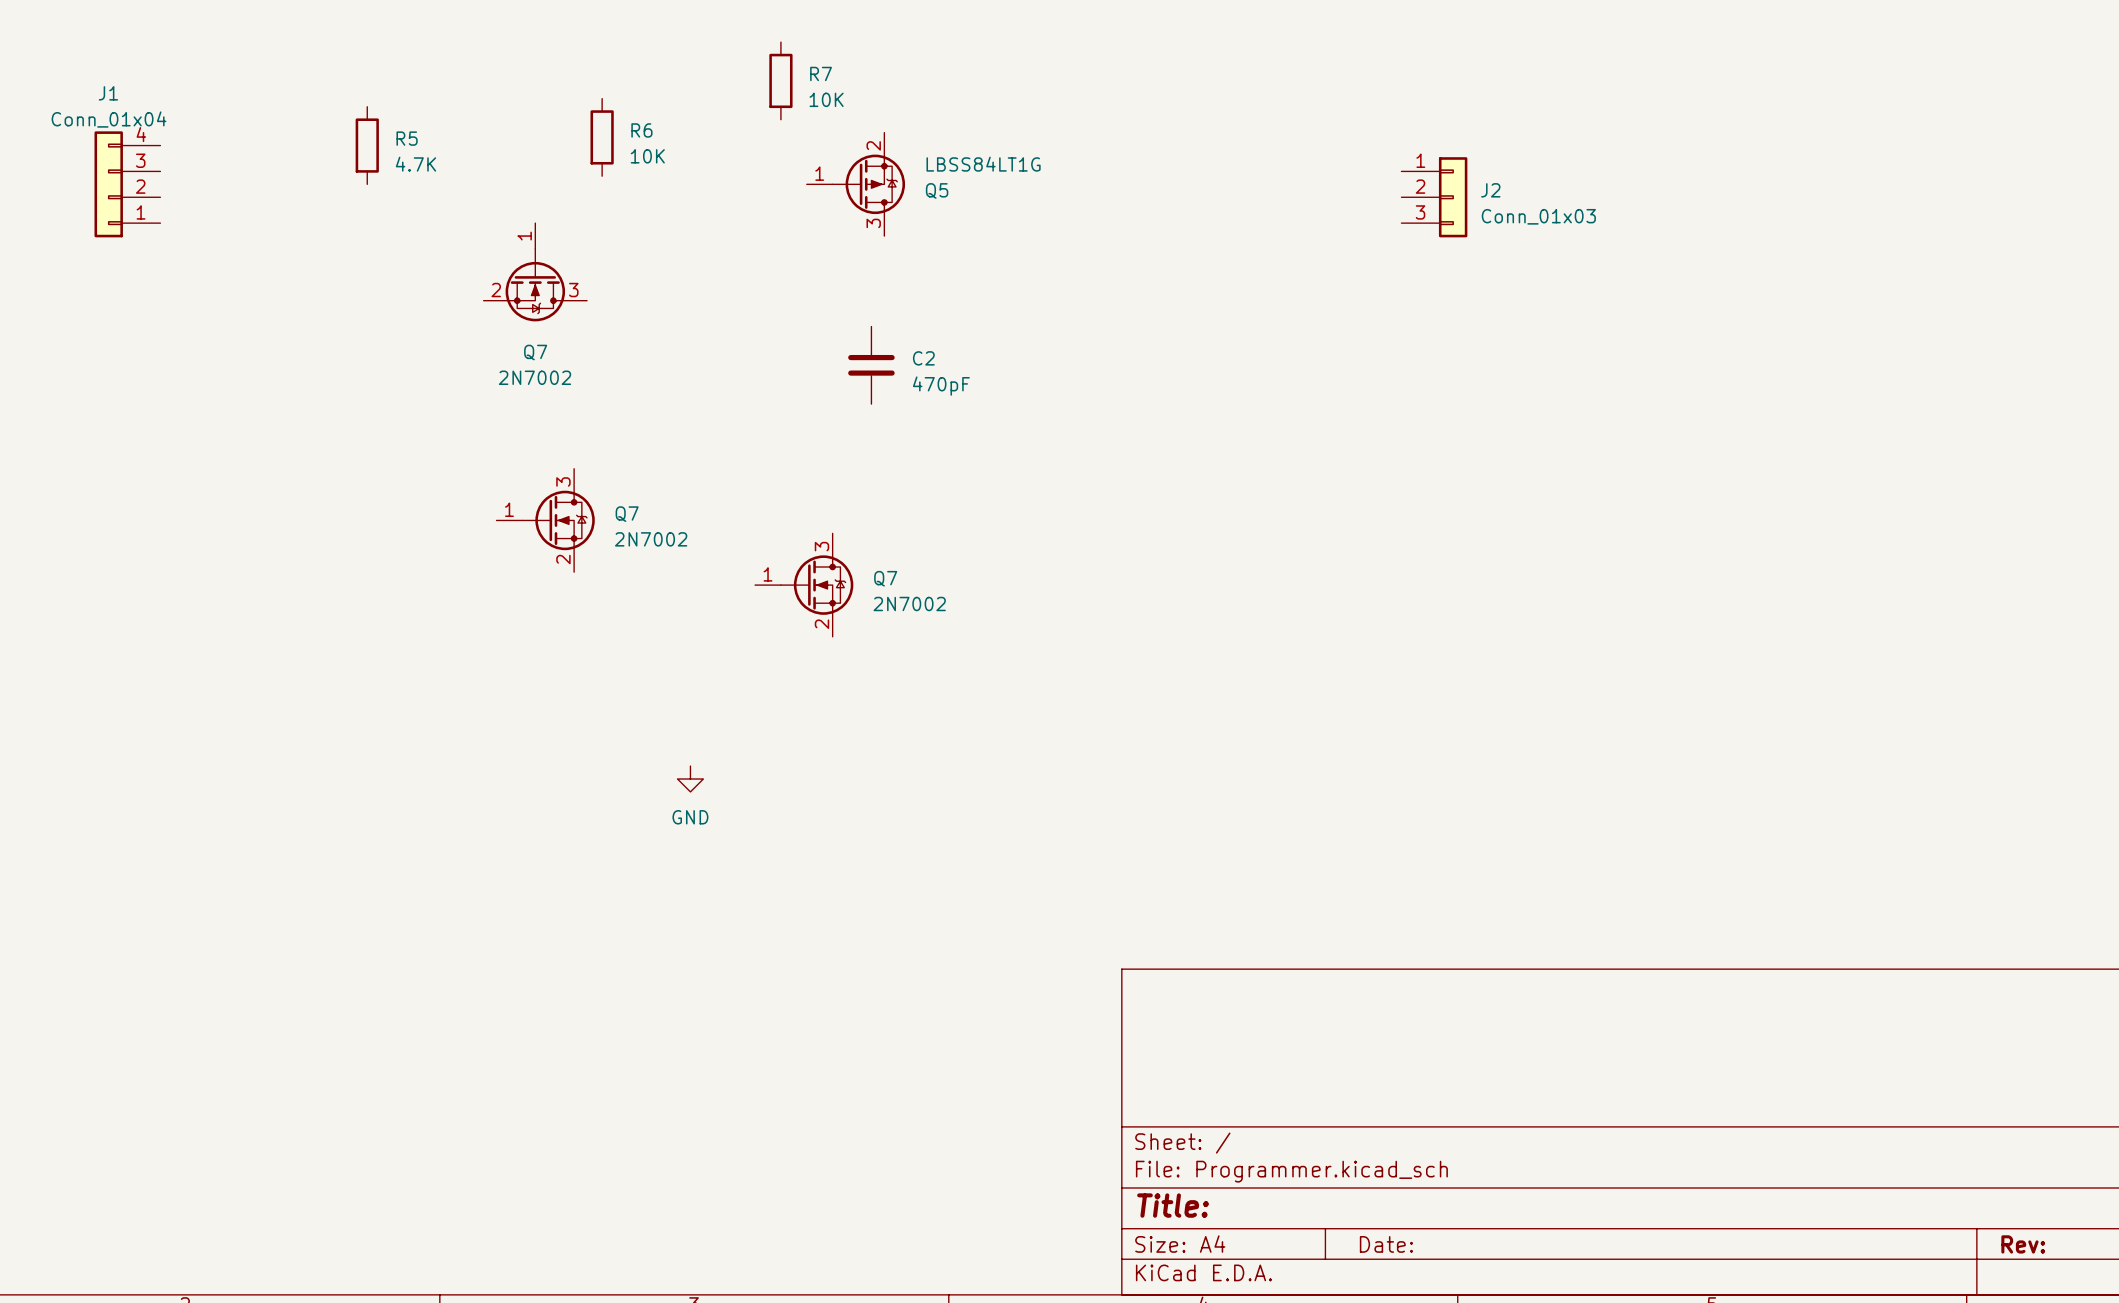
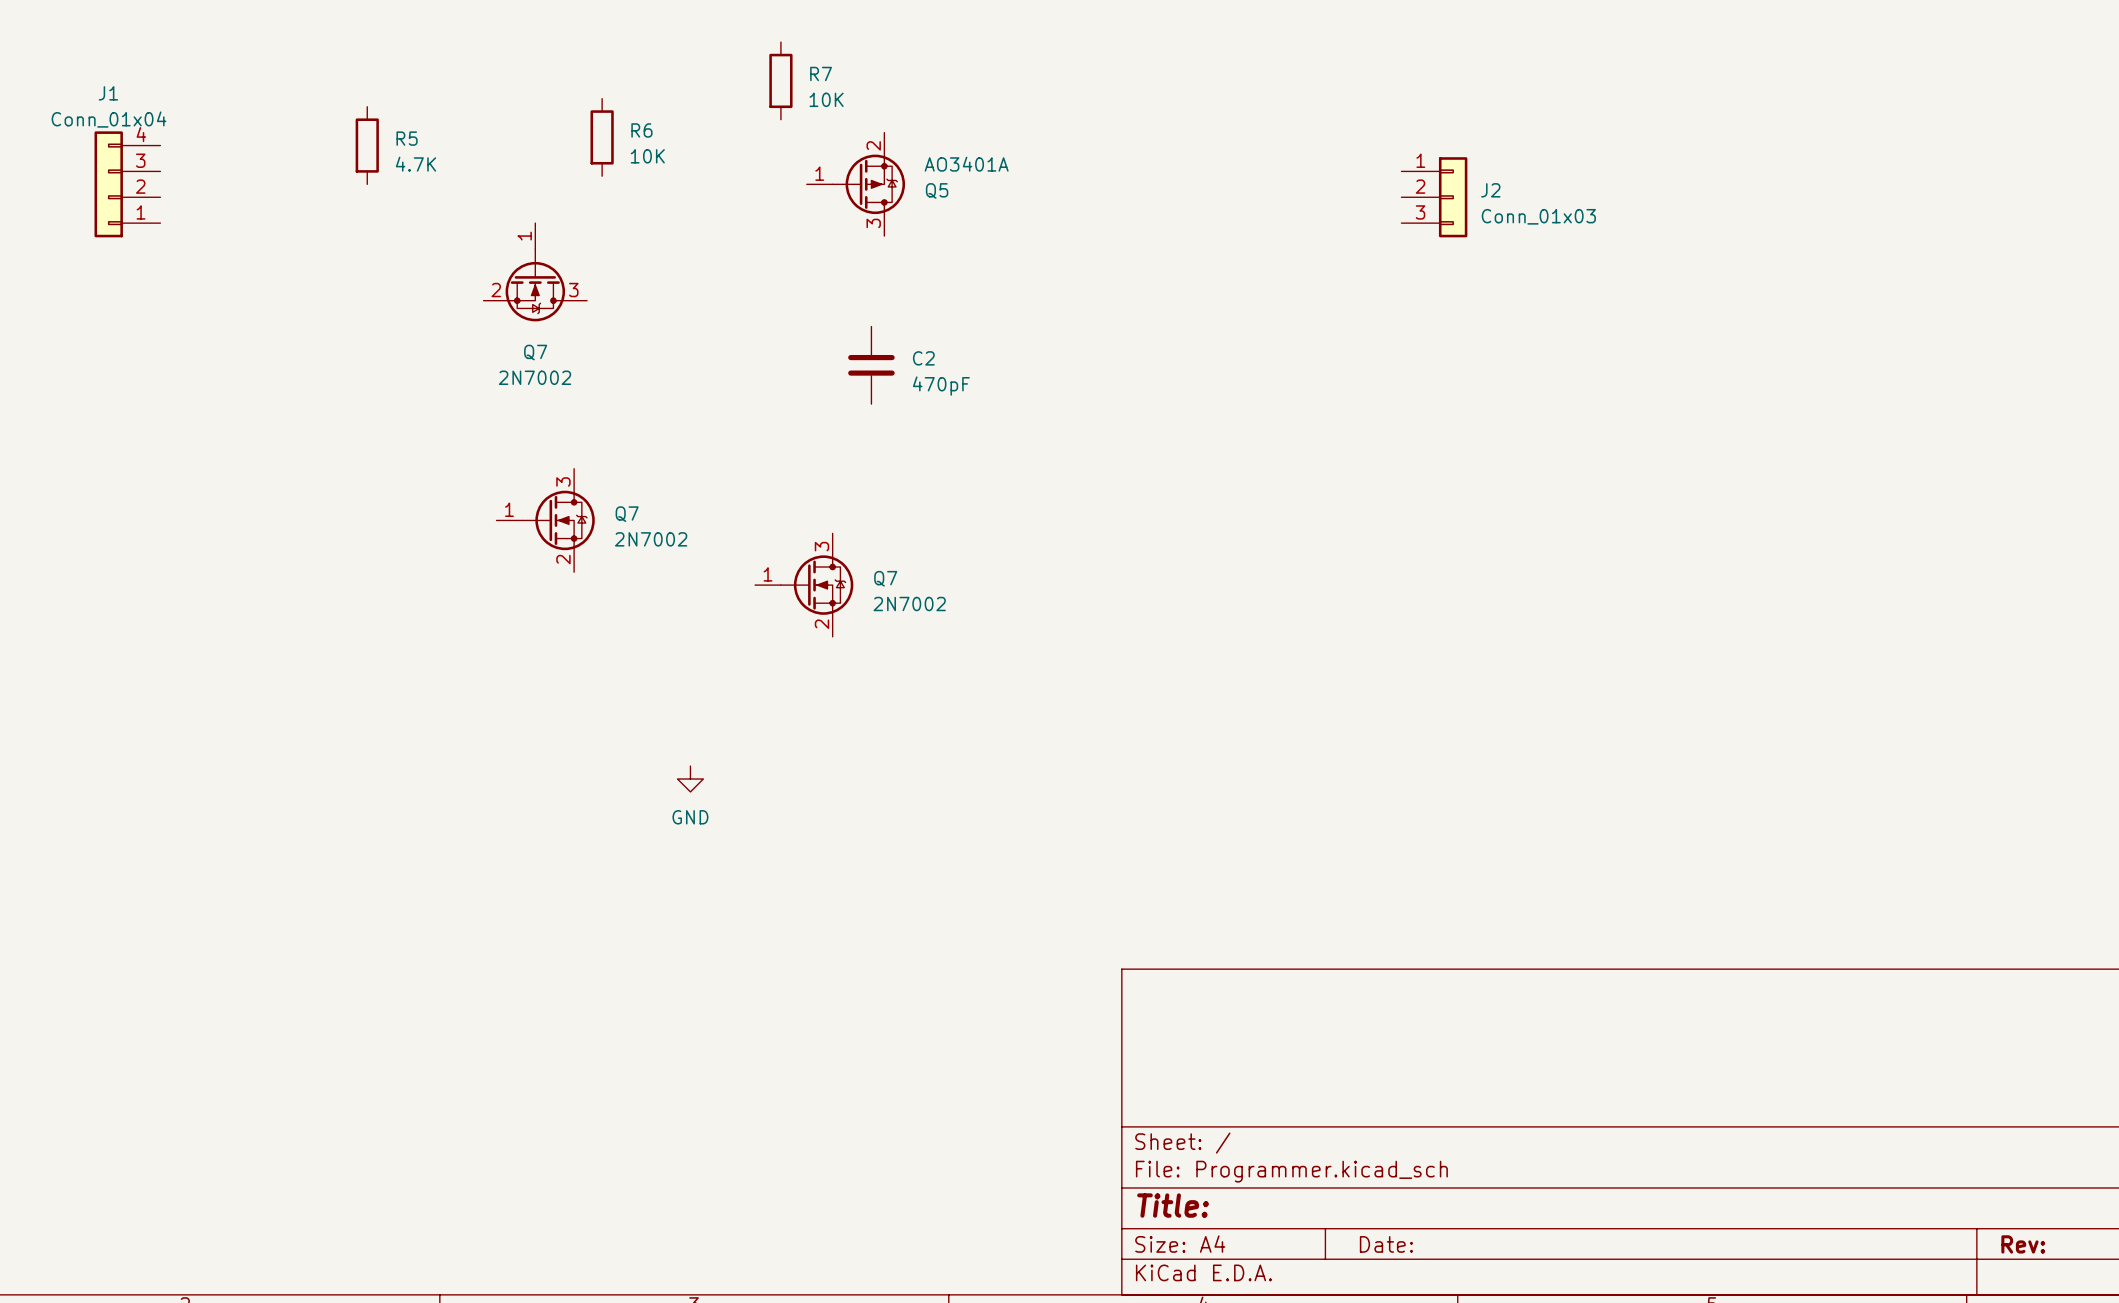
Q5 value: LBSS84LT1G (983, 164) -> AO3401A (966, 164)

